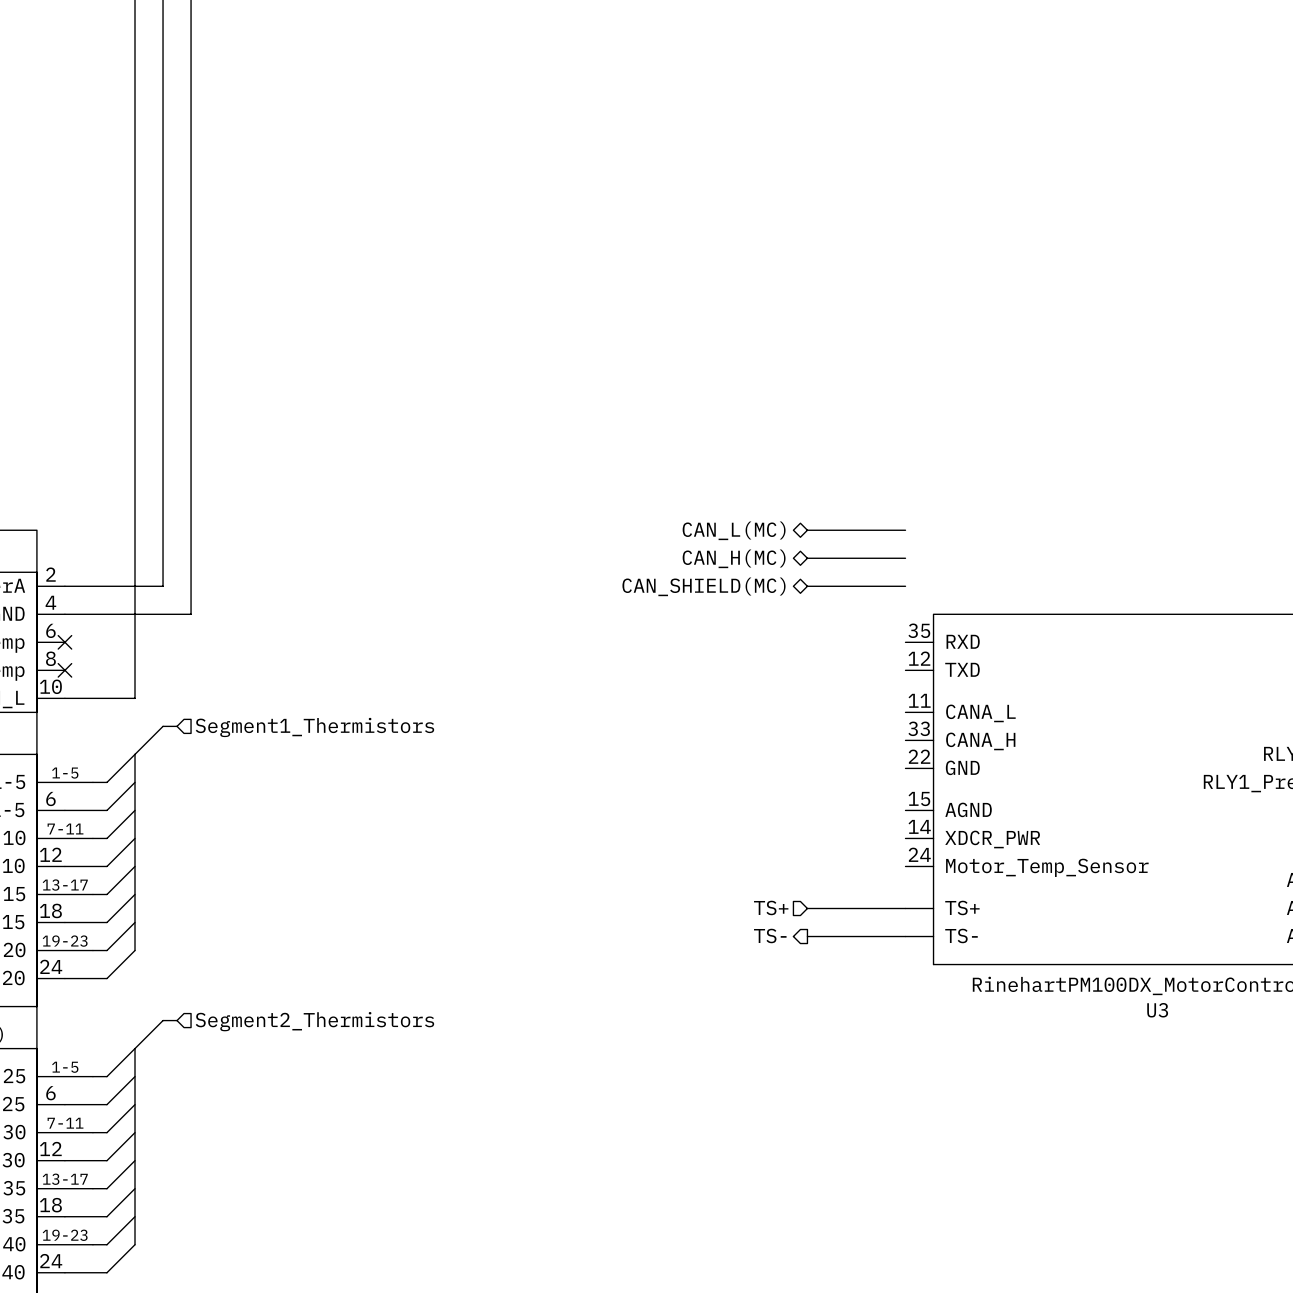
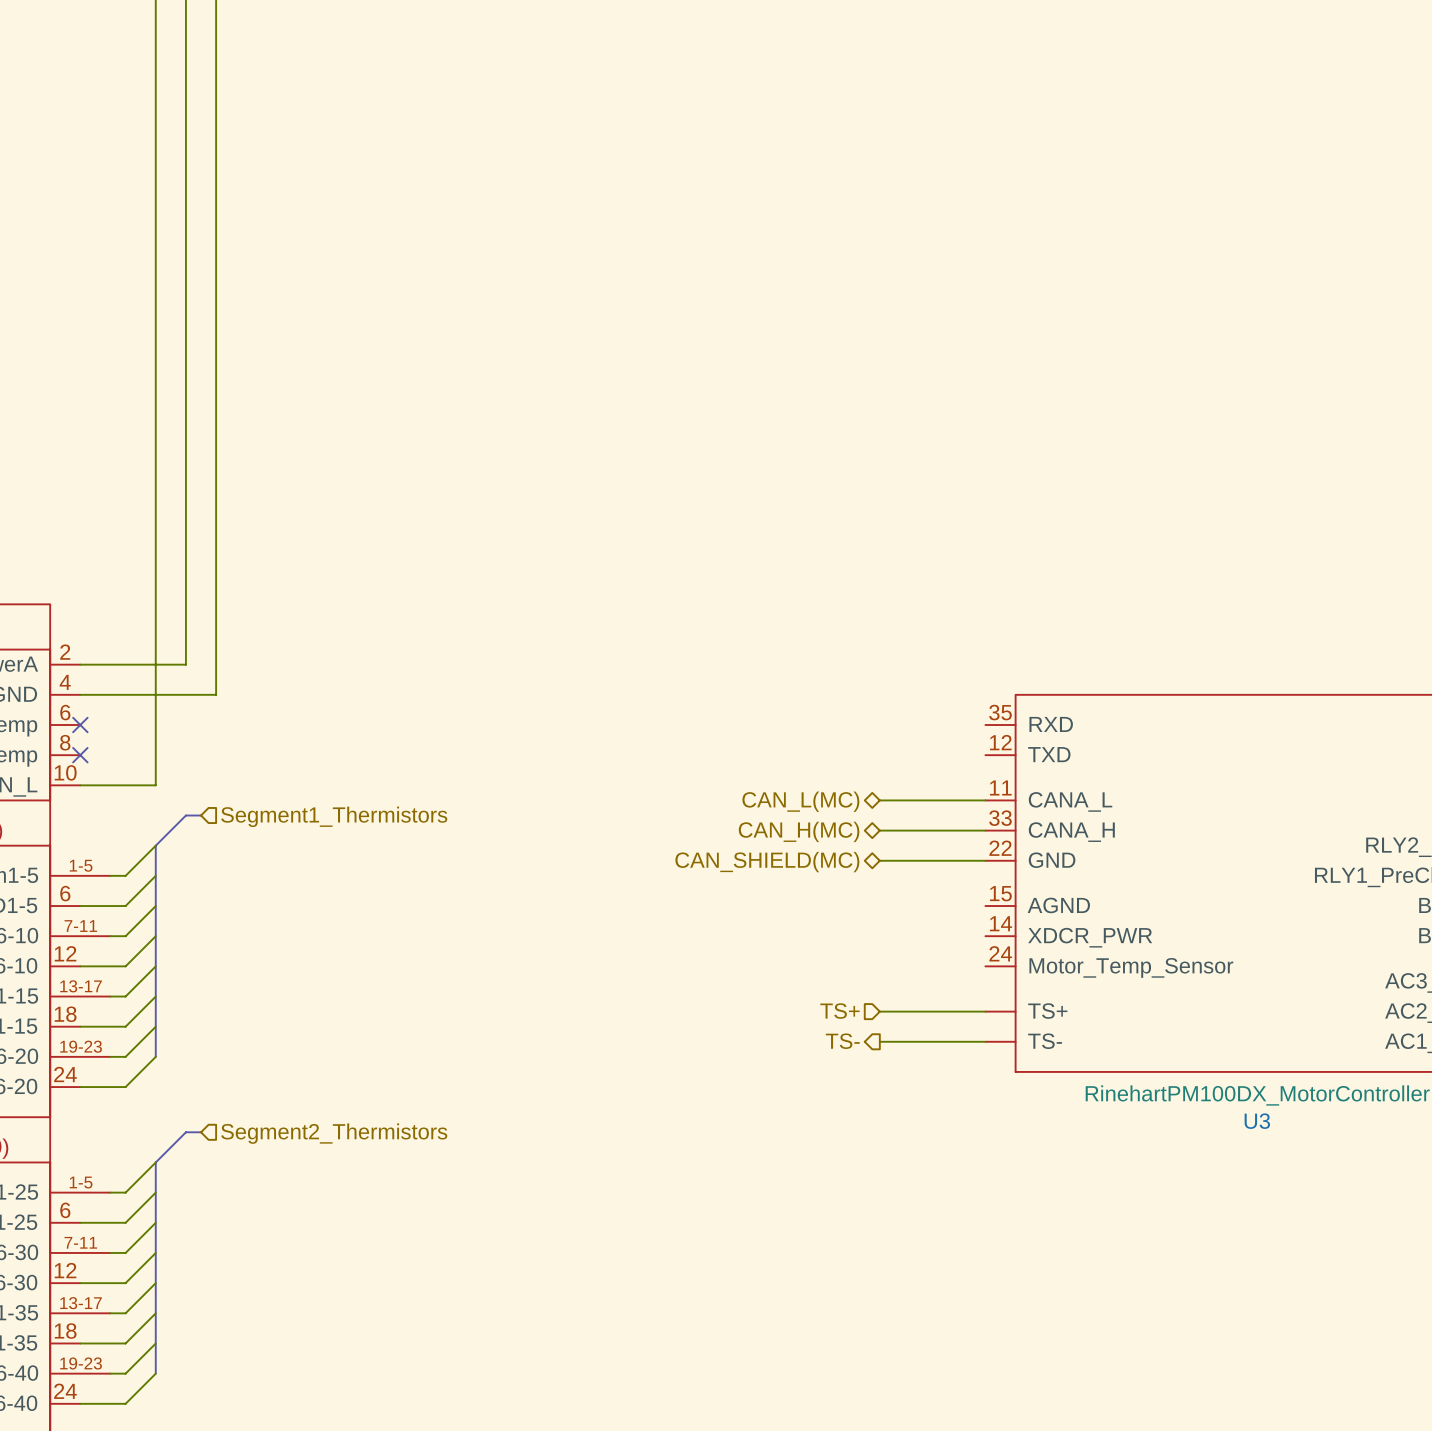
hierarchical label position: CAN_L(MC) (734, 530) -> CAN_L(MC) (800, 801)
wire: (807, 530) (905, 530) -> (879, 800) (985, 800)
hierarchical label position: CAN_H(MC) (734, 558) -> CAN_H(MC) (799, 831)
wire: (807, 558) (905, 558) -> (879, 830) (985, 830)
hierarchical label position: CAN_SHIELD(MC) (703, 586) -> CAN_SHIELD(MC) (767, 862)
wire: (807, 586) (905, 586) -> (879, 860) (985, 860)

